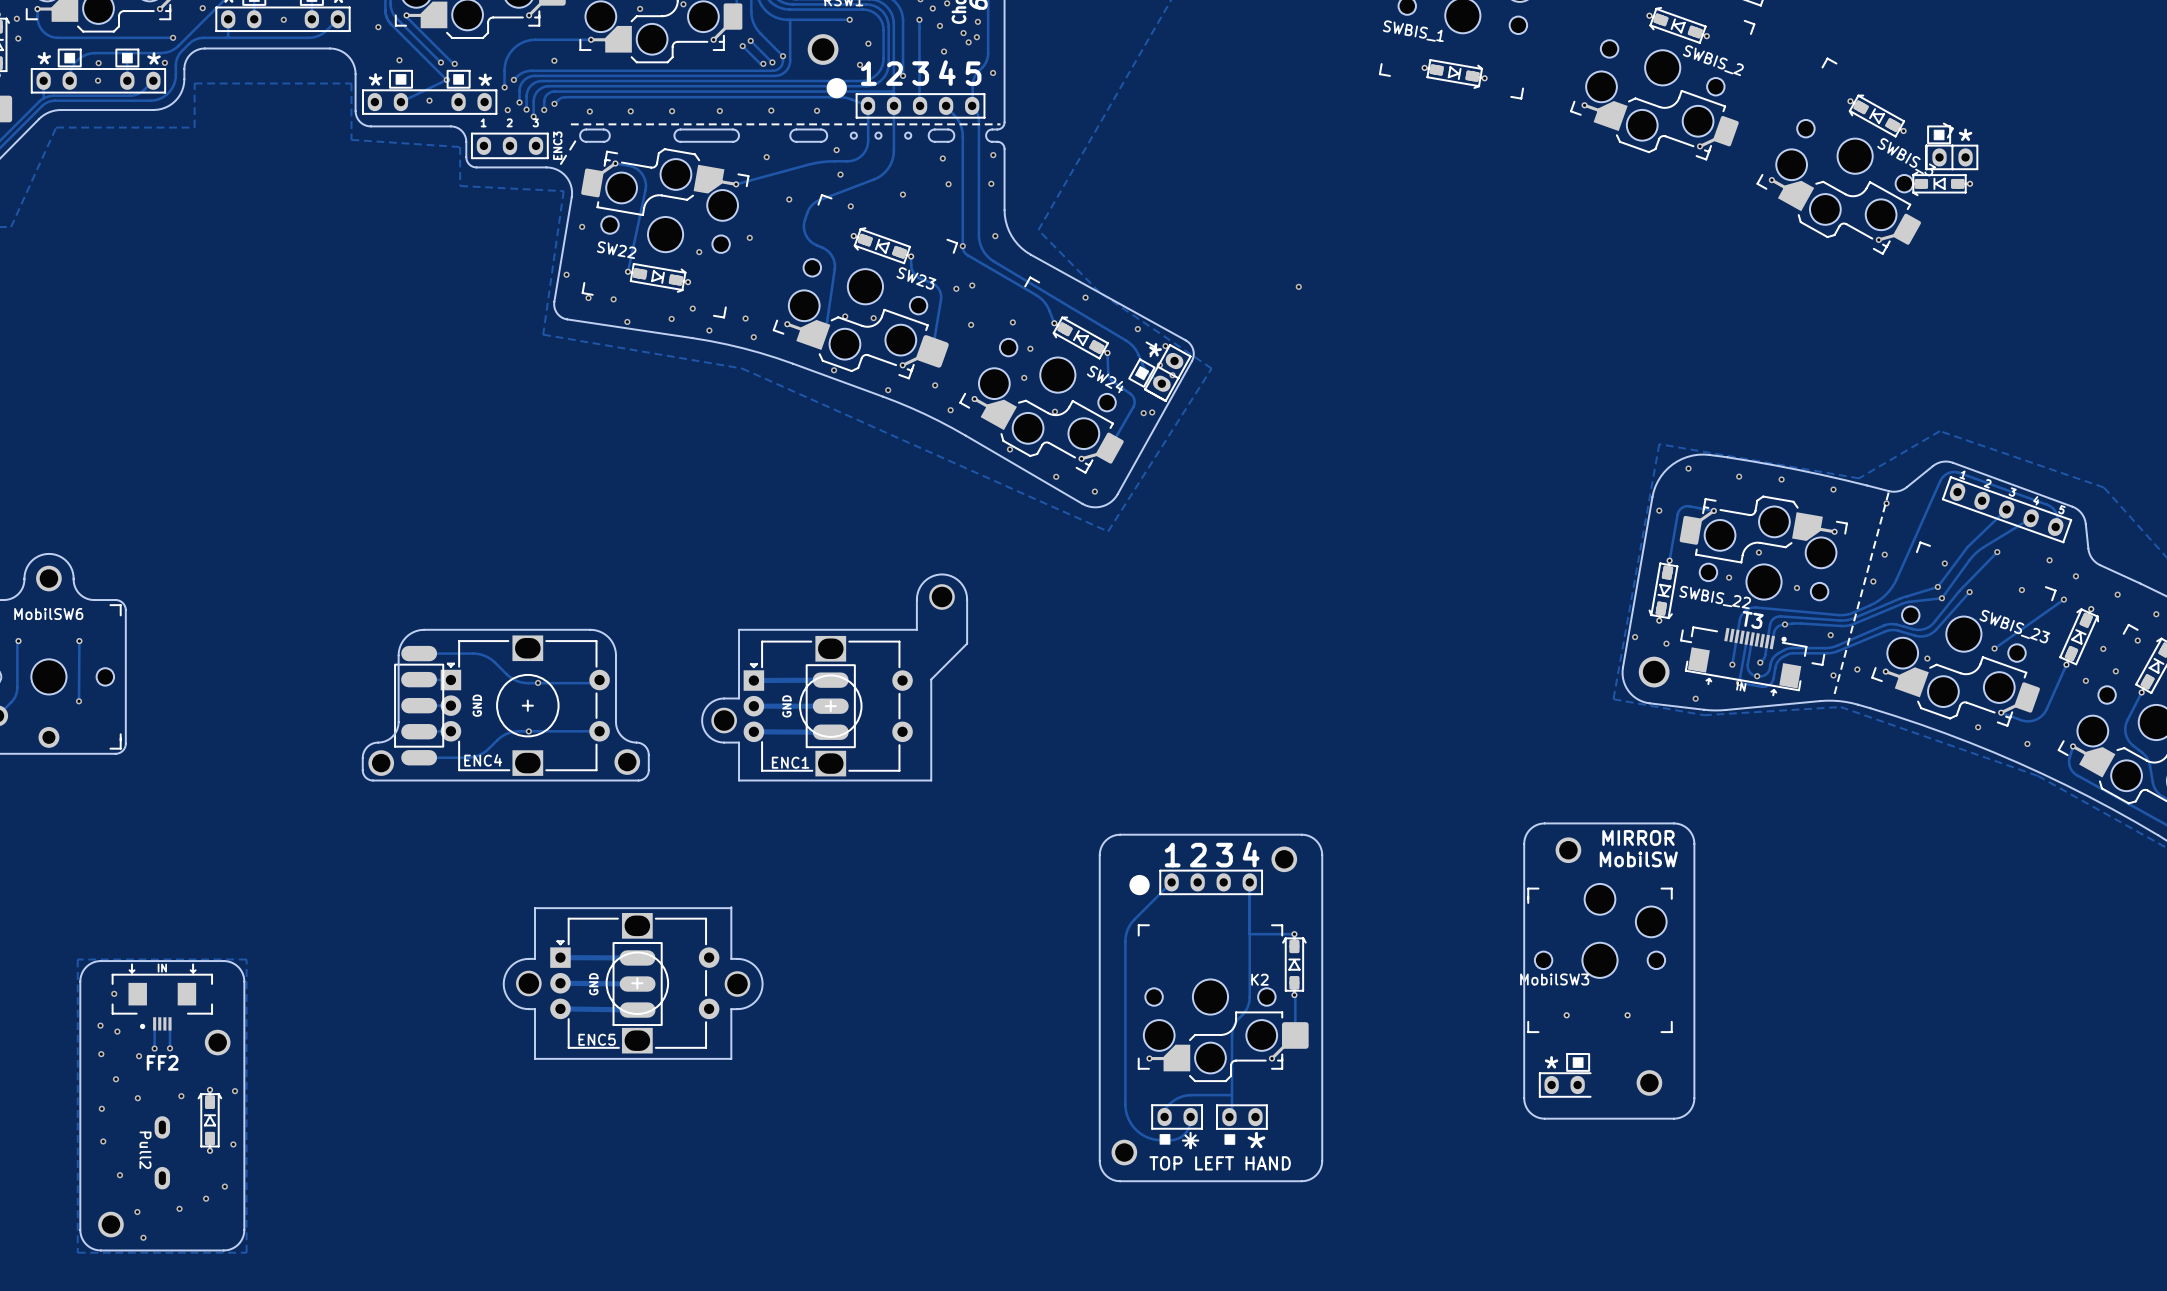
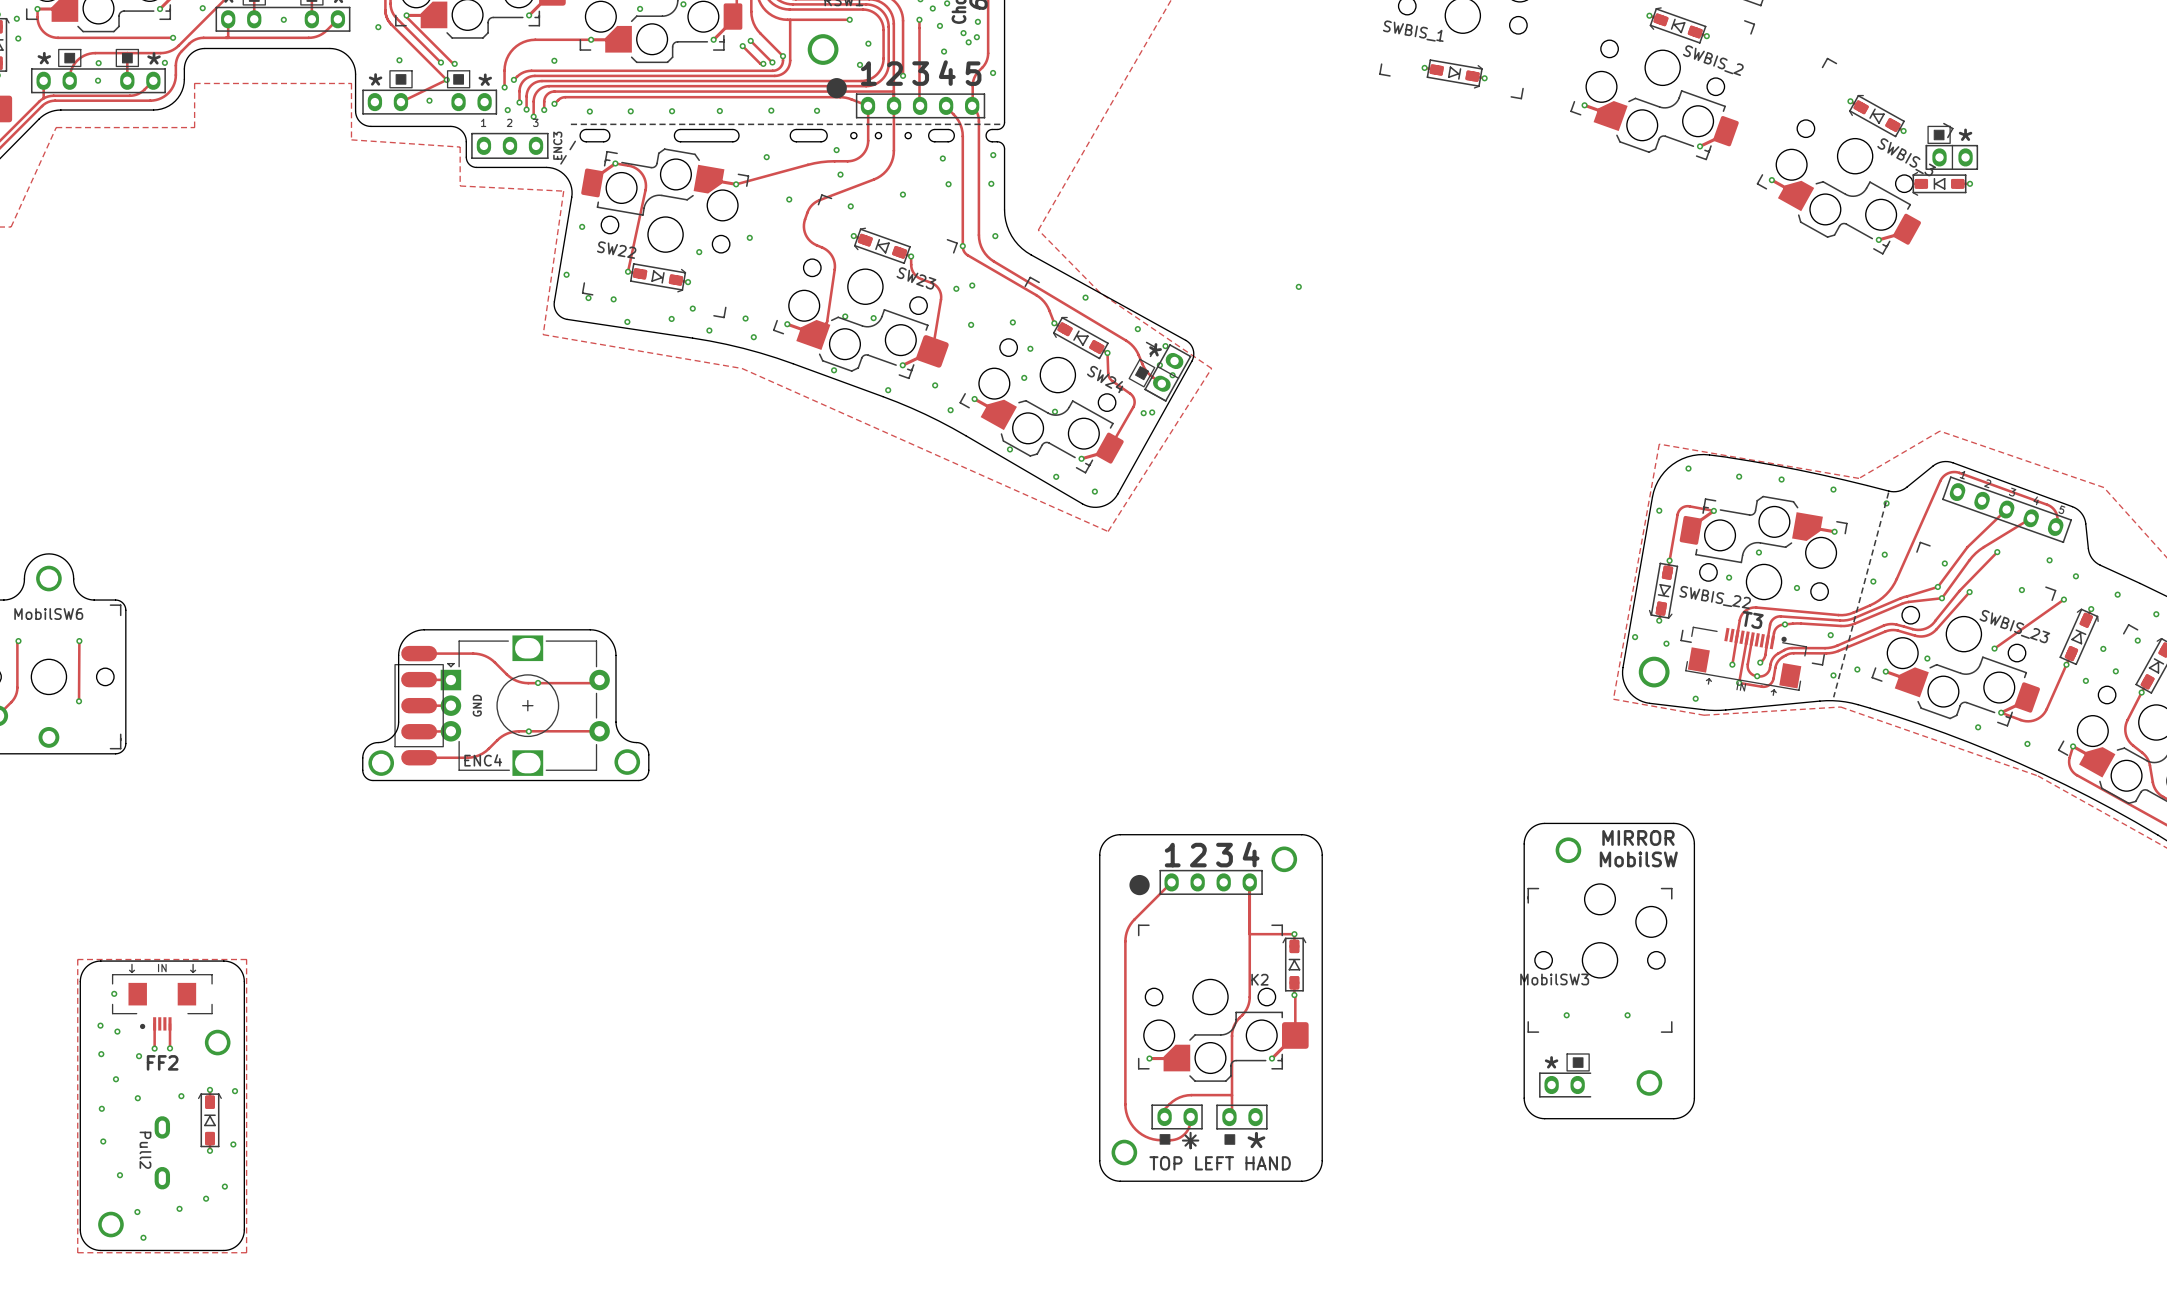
part: (942, 596) -> none
board edge: (916, 599) (916, 629) (739, 629) (739, 698) (721, 698) (713, 701) (704, 710) (702, 720) (704, 730) (713, 740) (721, 742) (739, 742) (739, 780) (931, 780) (931, 679) (967, 643) (966, 596) (964, 587) (958, 580) (950, 576) (942, 574) (933, 576) (923, 582) (918, 590) (916, 599) -> none
track: (830, 680) (753, 680) -> none
track: (753, 706) (830, 706) -> none
ENC1: (828, 706) -> none
part: (830, 706) -> none
part: (724, 720) -> none
track: (753, 731) (830, 732) -> none
board edge: (731, 907) (731, 958) (743, 959) (754, 965) (760, 975) (762, 984) (760, 992) (754, 1002) (743, 1008) (731, 1009) (731, 1058) (534, 1058) (534, 1009) (522, 1008) (513, 1003) (505, 993) (503, 984) (505, 974) (513, 964) (522, 959) (534, 958) (534, 908) (731, 908) -> none
track: (560, 957) (637, 957) -> none
part: (528, 983) -> none
track: (560, 983) (637, 984) -> none
ENC5: (634, 983) -> none
part: (637, 984) -> none
part: (737, 984) -> none
track: (560, 1008) (637, 1010) -> none

